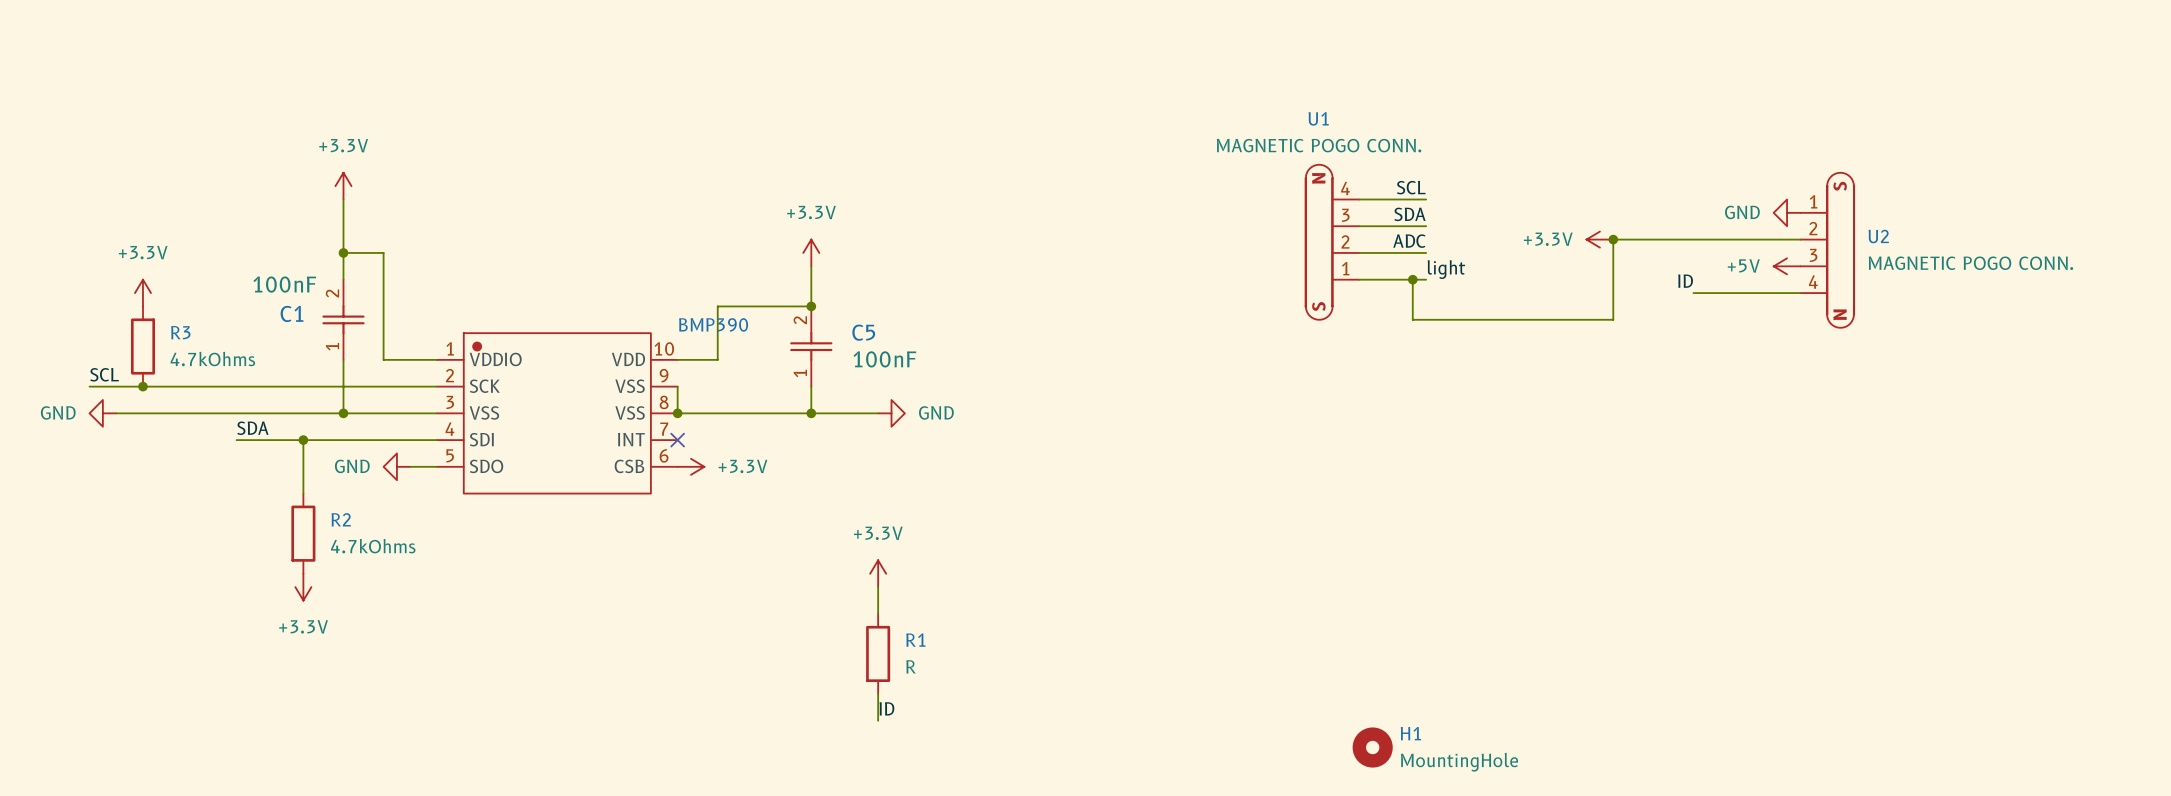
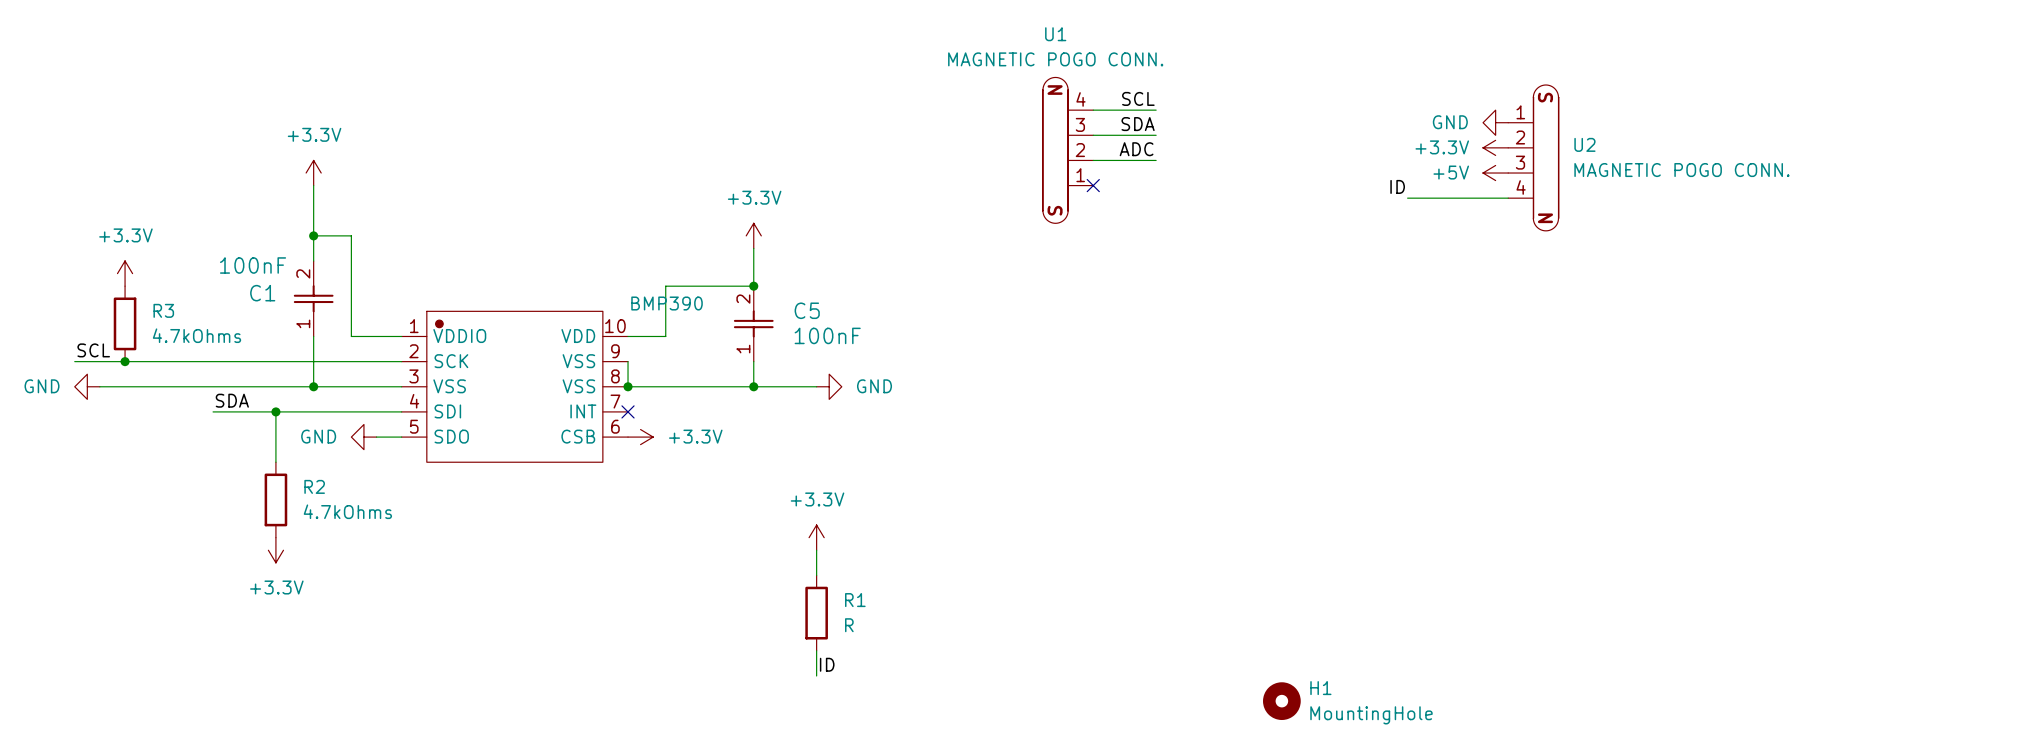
label position: SCL (1411, 187) -> SCL (1138, 98)
no-connect mark: none -> (1093, 185)
wire: (1359, 199) (1426, 199) -> (1093, 110) (1156, 110)
power symbol position: GND (1787, 212) -> GND (1495, 122)
label position: SDA (1409, 214) -> SDA (1138, 124)
wire: (1359, 226) (1426, 226) -> (1093, 135) (1156, 135)
power symbol position: +3.3V (1599, 239) -> +3.3V (1495, 147)
junction: (1613, 239) -> none
wire: (1800, 239) (1613, 239) (1613, 319) (1412, 319) (1412, 279) -> none
label position: ADC (1409, 241) -> ADC (1136, 149)
U1 position: (1332, 242) -> (1067, 150)
U2 position: (1827, 250) -> (1533, 157)
wire: (1359, 252) (1426, 252) -> (1093, 160) (1156, 160)
power symbol position: +5V (1787, 266) -> +5V (1495, 173)
label: light (1446, 269) -> none
wire: (1359, 279) (1426, 279) -> none
junction: (1412, 279) -> none
label position: ID (1685, 281) -> ID (1397, 186)
wire: (1693, 293) (1800, 293) -> (1407, 198) (1508, 198)

